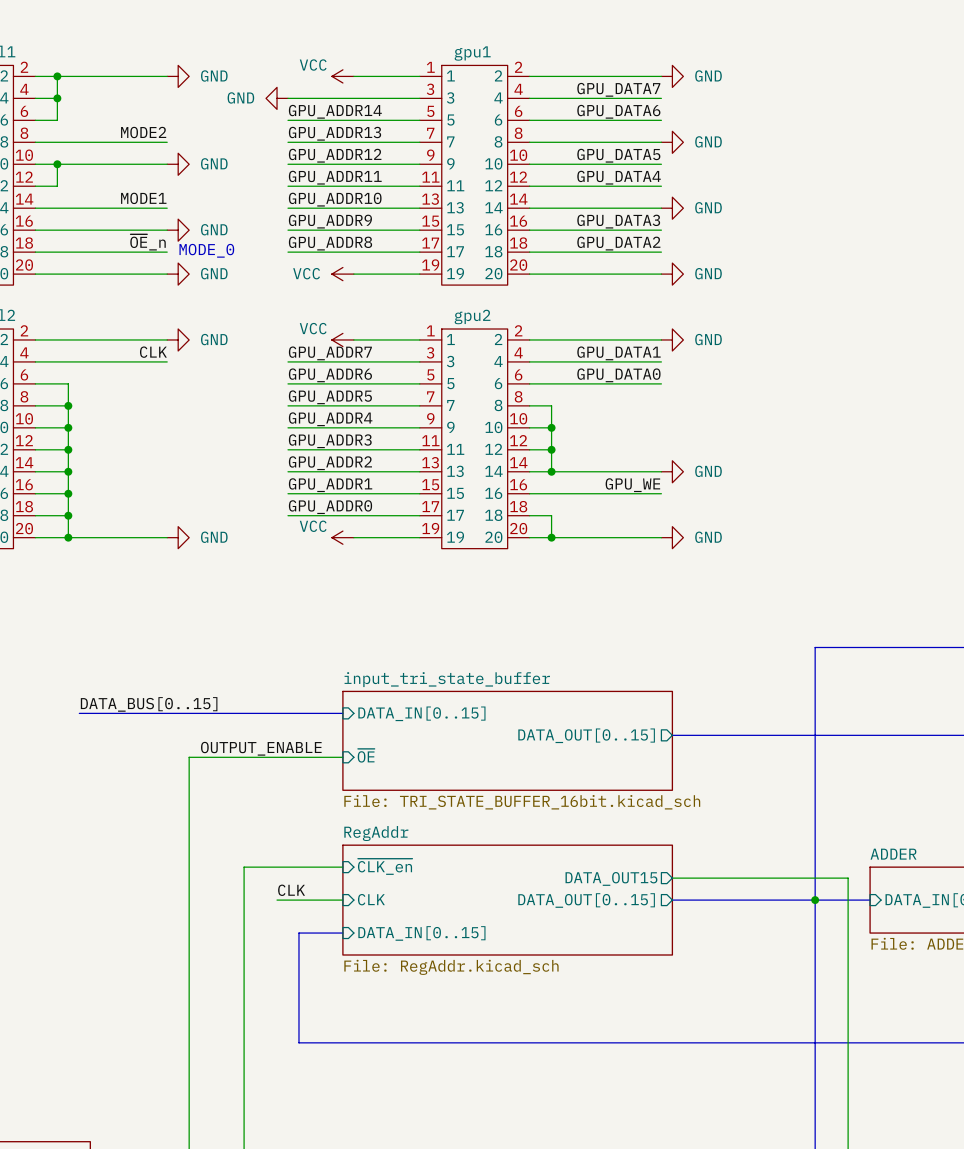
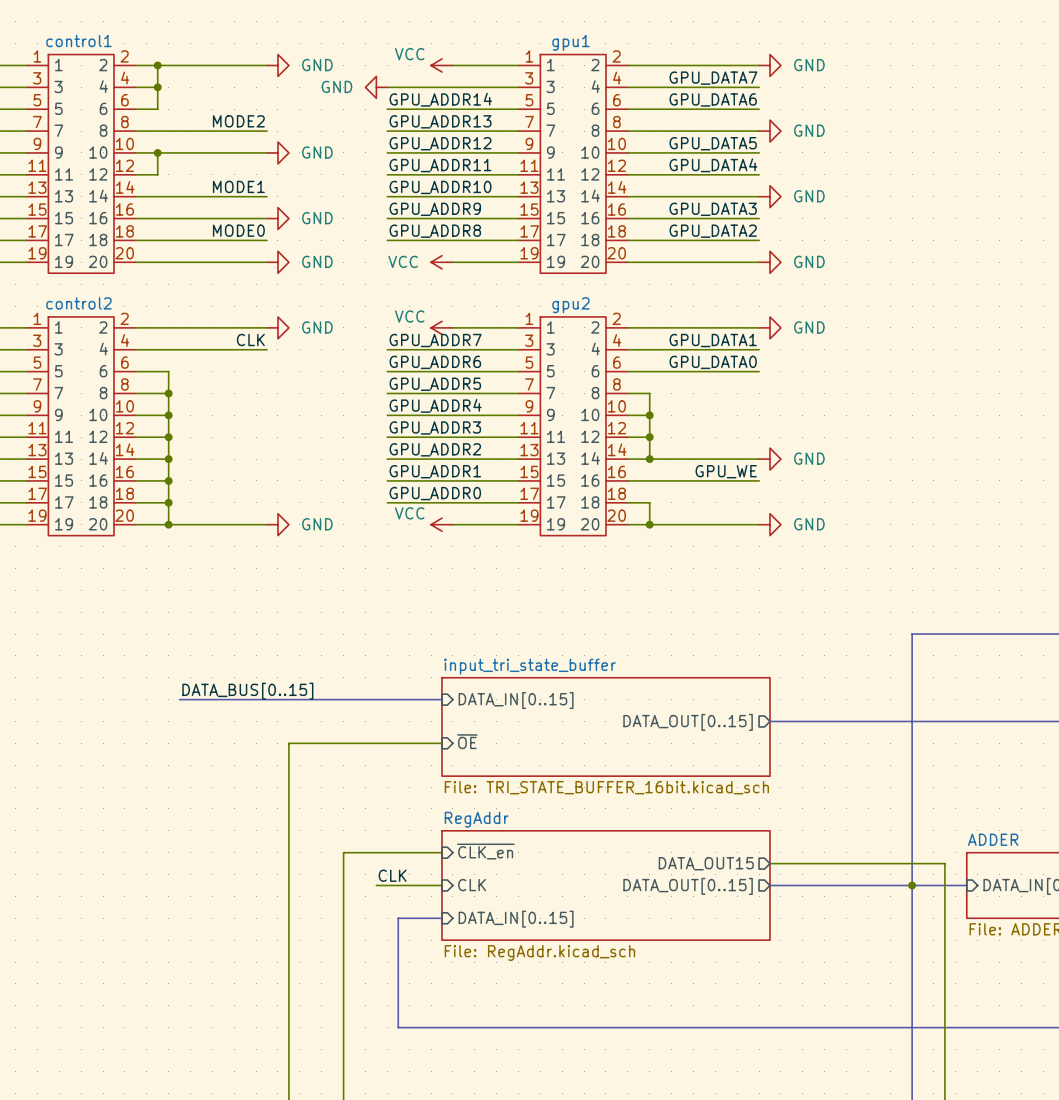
label: ~{OE}_n (148, 242) -> MODE0 (238, 230)
text: MODE_0 (206, 250) -> none
label: OUTPUT_ENABLE (261, 748) -> none

